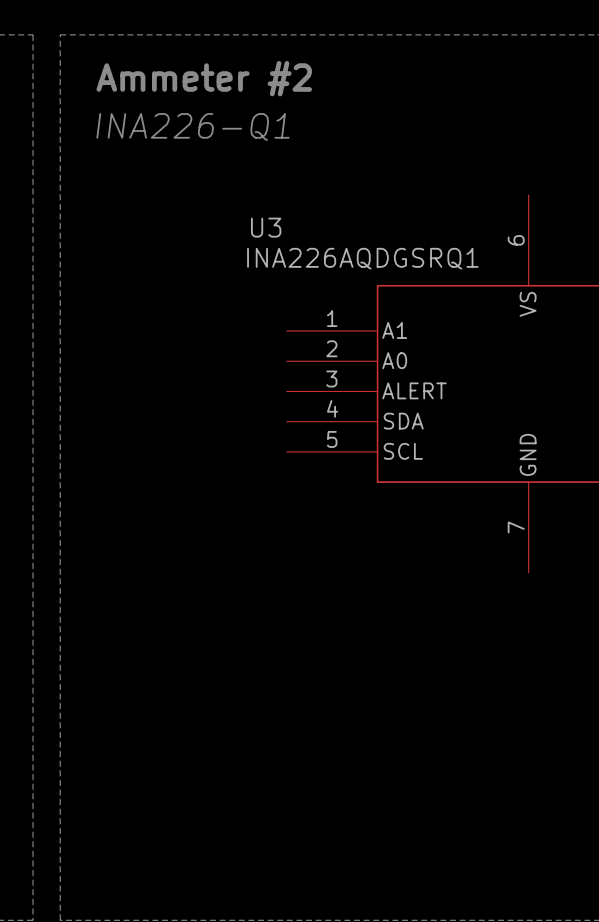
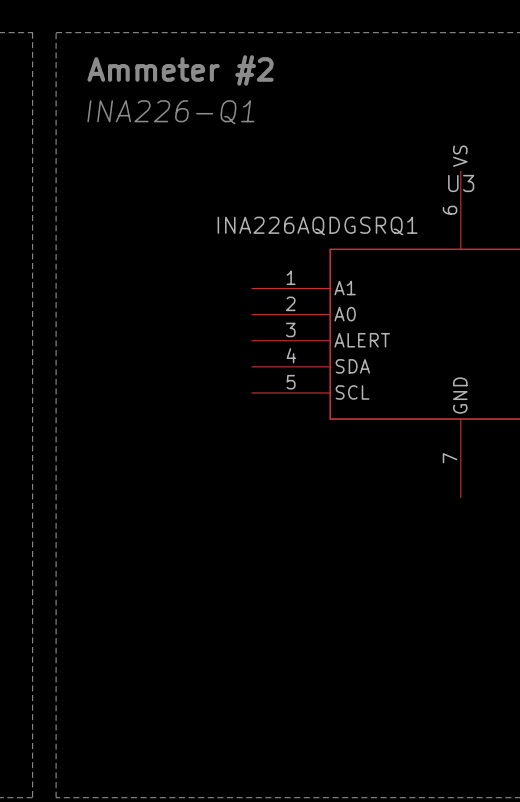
U3 pin name: none -> VS (460, 156)
U3 name position: U3 (266, 227) -> U3 (461, 183)
U3 pin name: VS (528, 304) -> none

